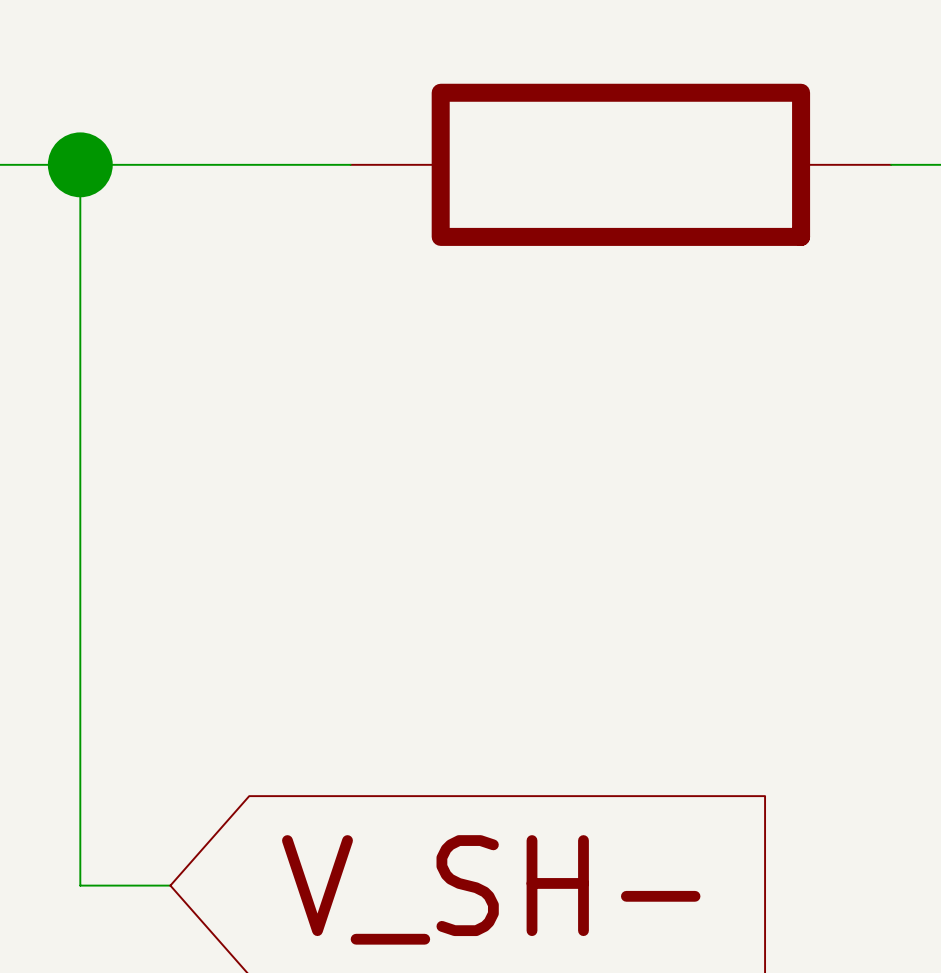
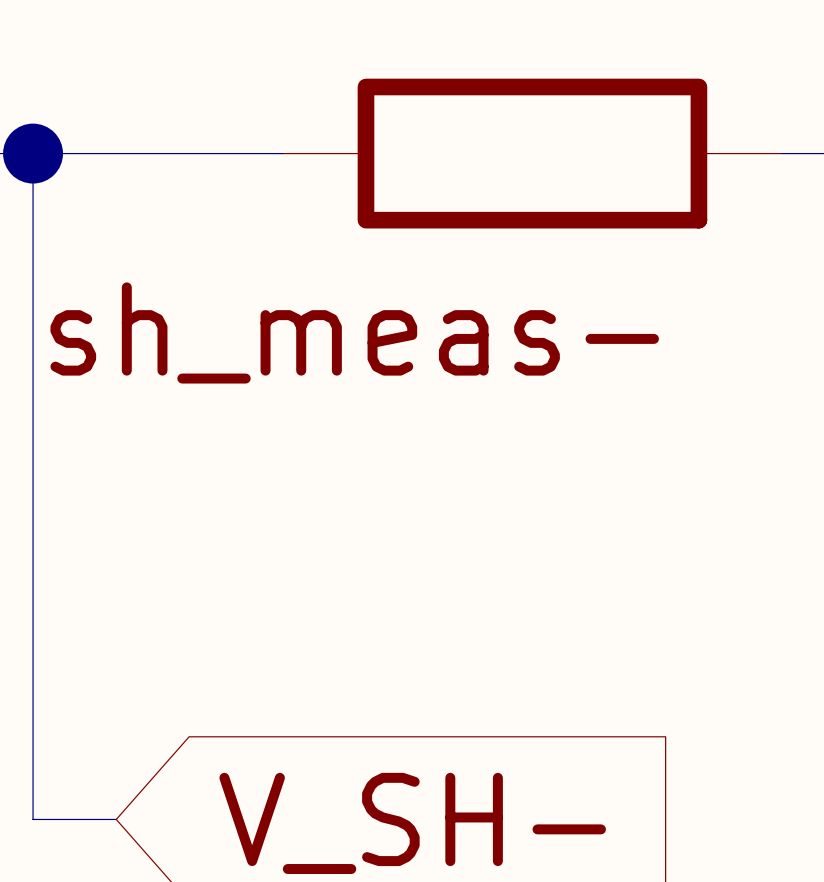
label: none -> sh_meas- (354, 332)

